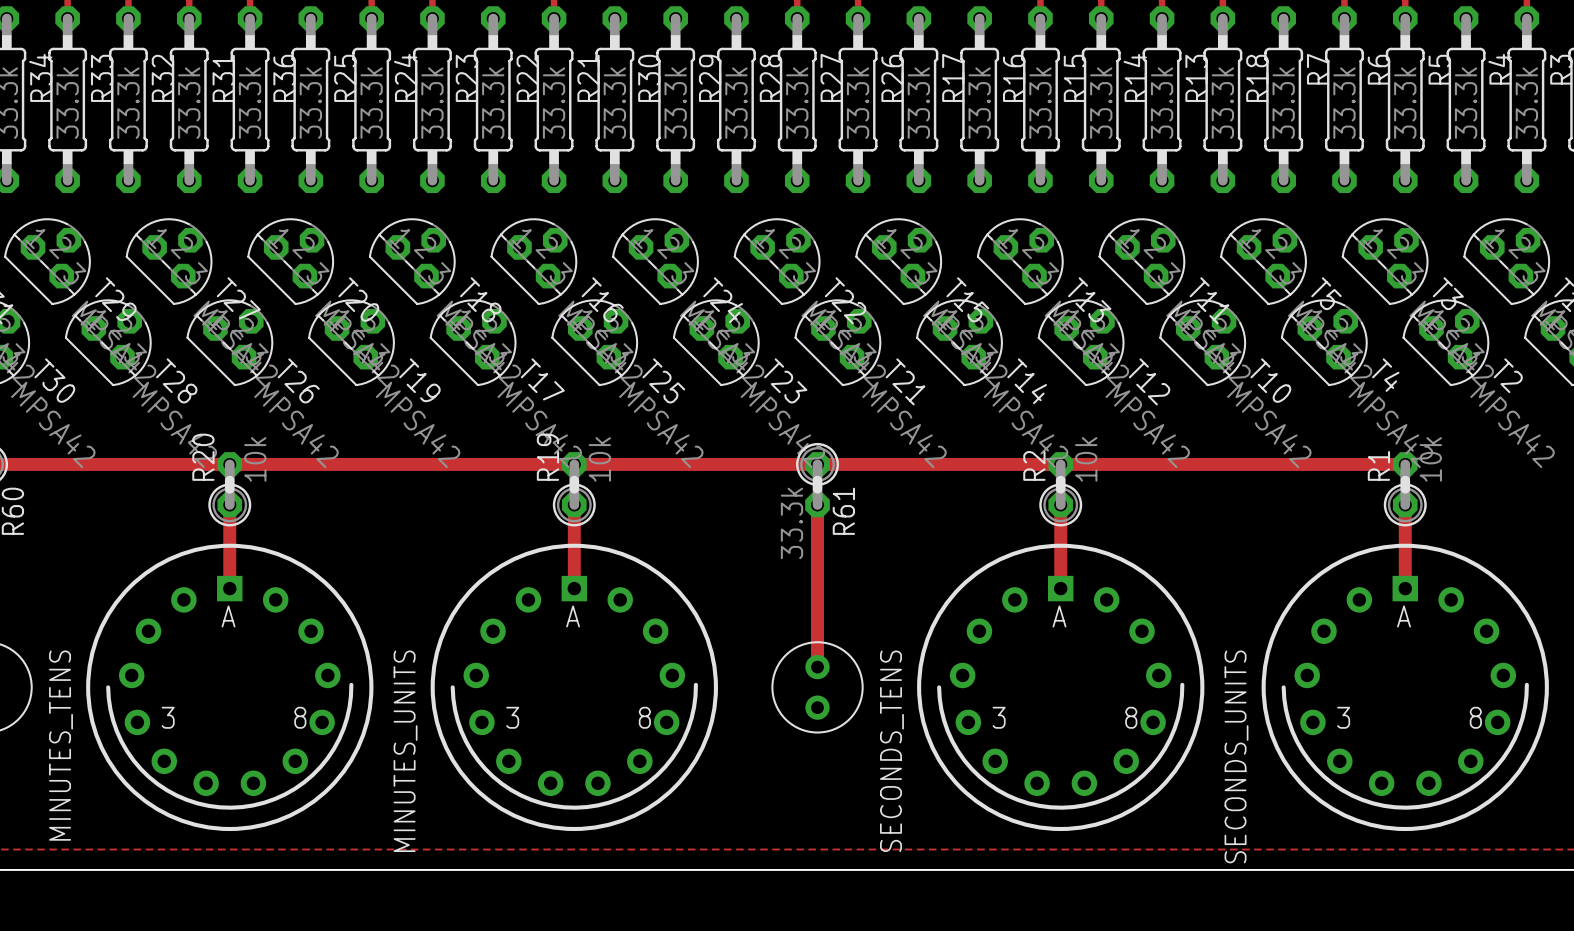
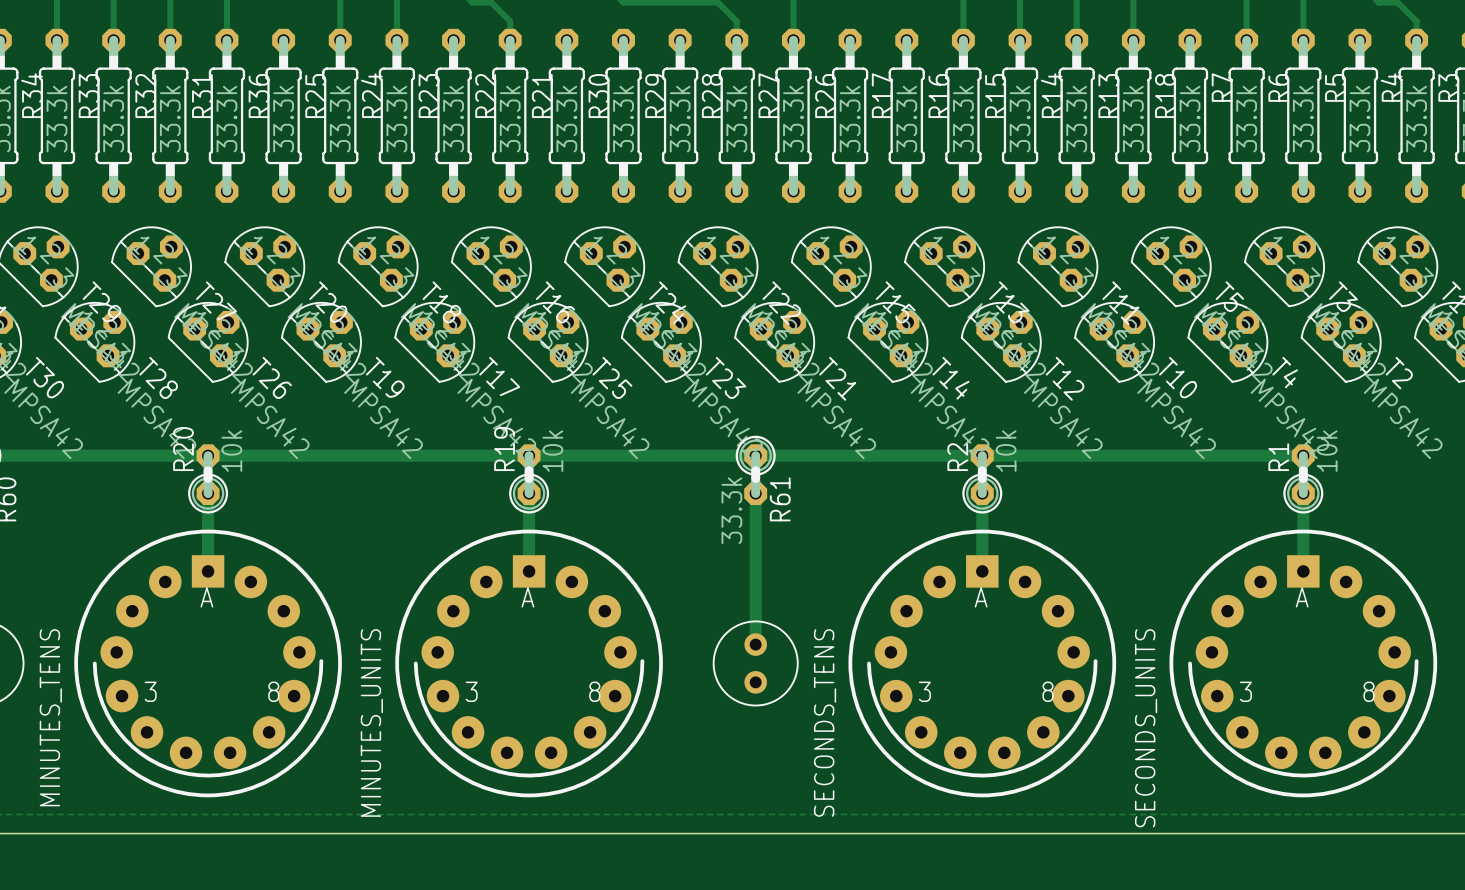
MINUTES_TENS footprint: [86, 543, 374, 832] -> [74, 529, 342, 798]
MINUTES_UNITS footprint: [430, 543, 718, 832] -> [395, 529, 663, 798]
SECONDS_TENS footprint: [917, 543, 1205, 832] -> [848, 529, 1117, 798]
SECONDS_UNITS footprint: [1261, 543, 1549, 832] -> [1169, 529, 1438, 798]

